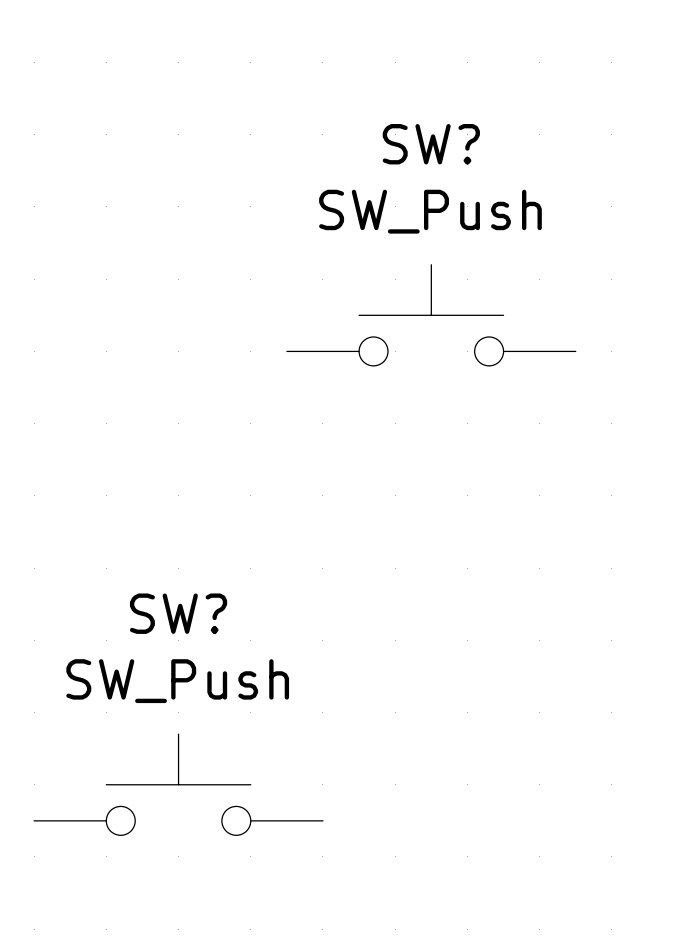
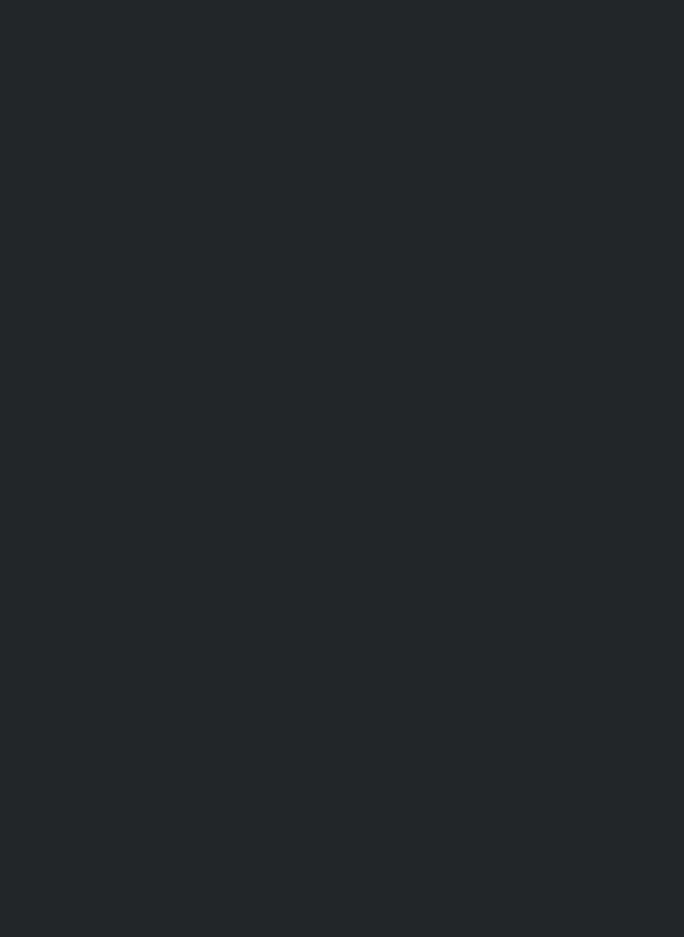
SW?: SW_Push (431, 315) -> none
SW?: SW_Push (178, 784) -> none

